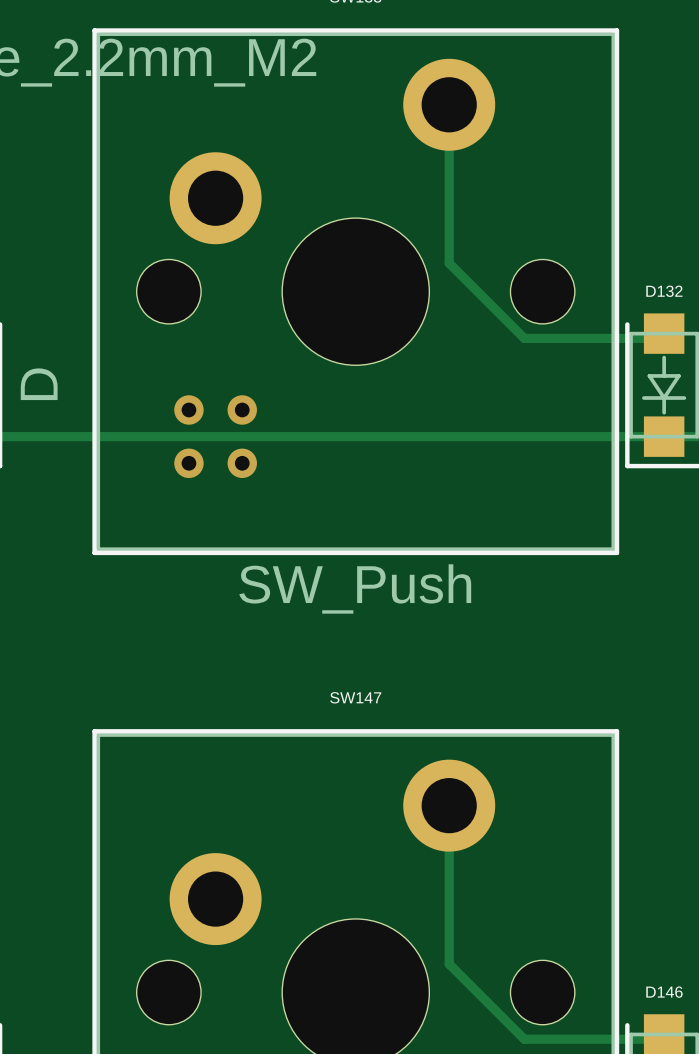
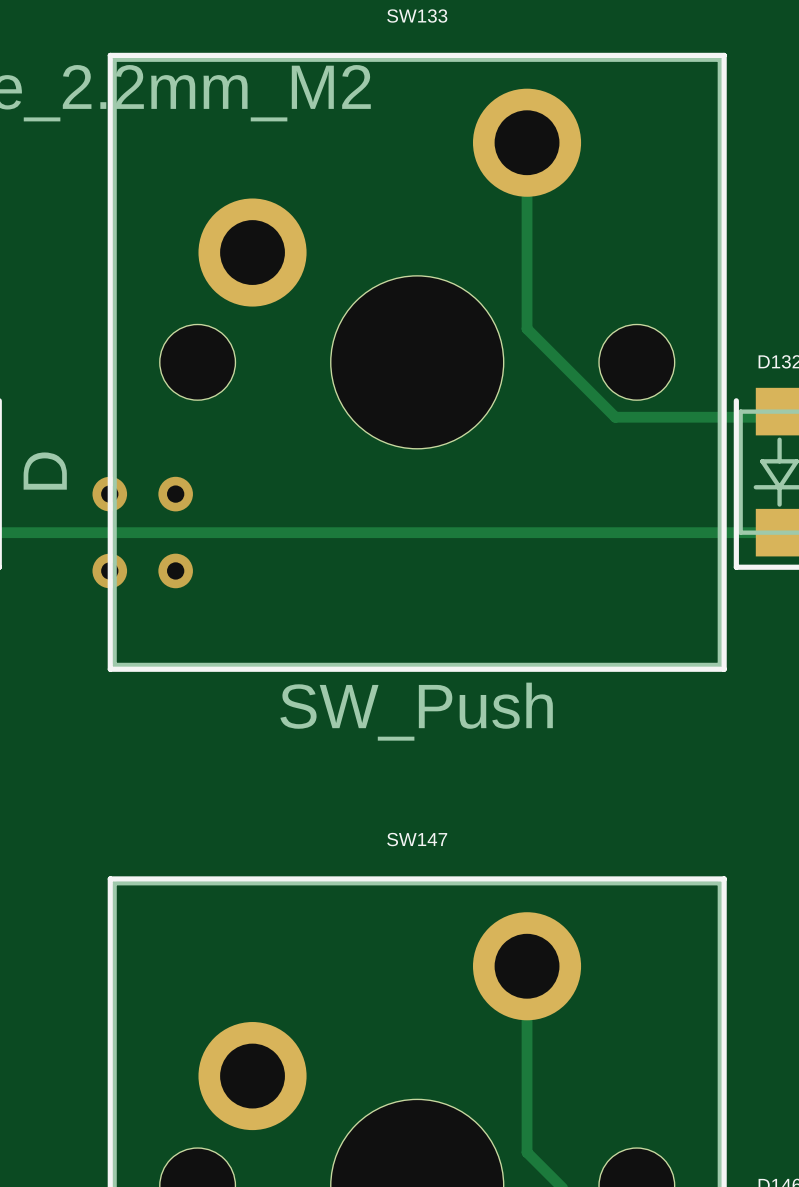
via: none -> (109, 494)
via: none -> (175, 494)
via: (188, 409) -> none
via: (242, 409) -> none
via: (188, 463) -> none
via: (242, 463) -> none
via: none -> (109, 570)
via: none -> (175, 570)

